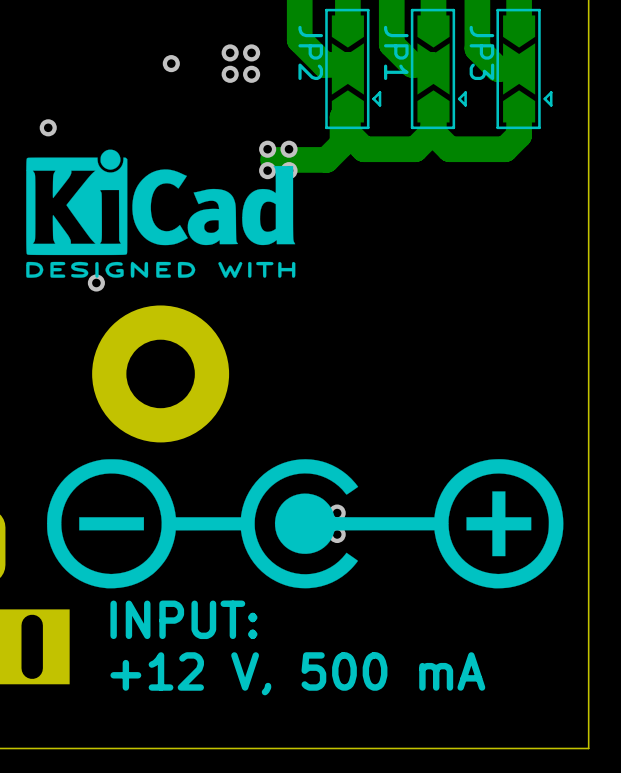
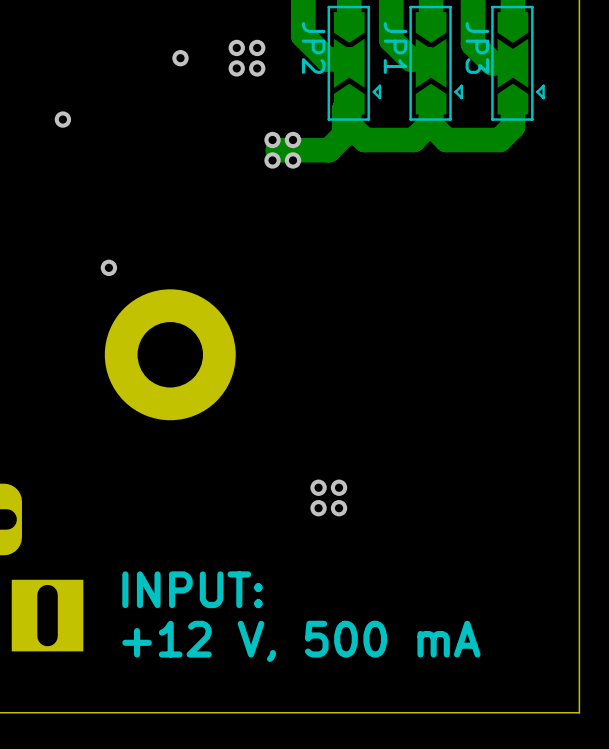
drawing: [26, 149, 296, 278] -> none
drawing: [47, 459, 564, 589] -> none

